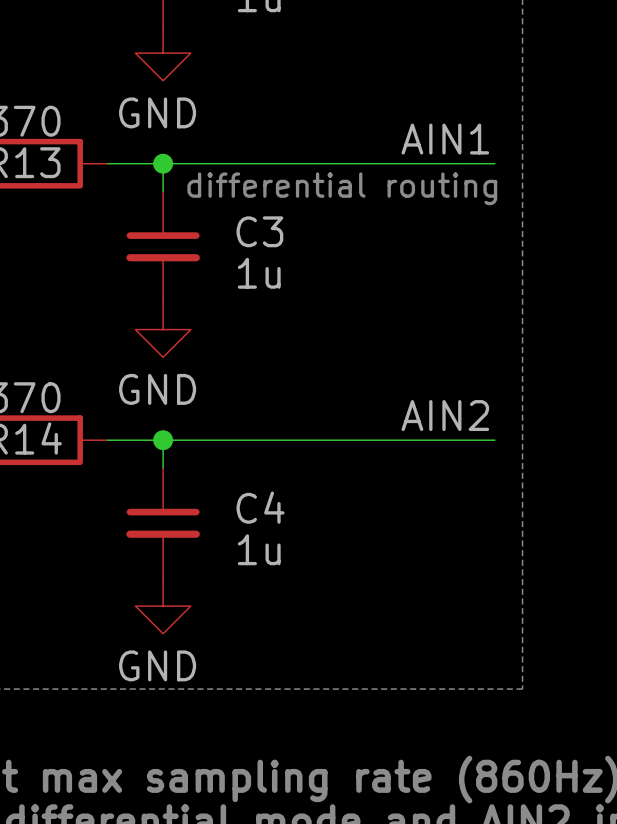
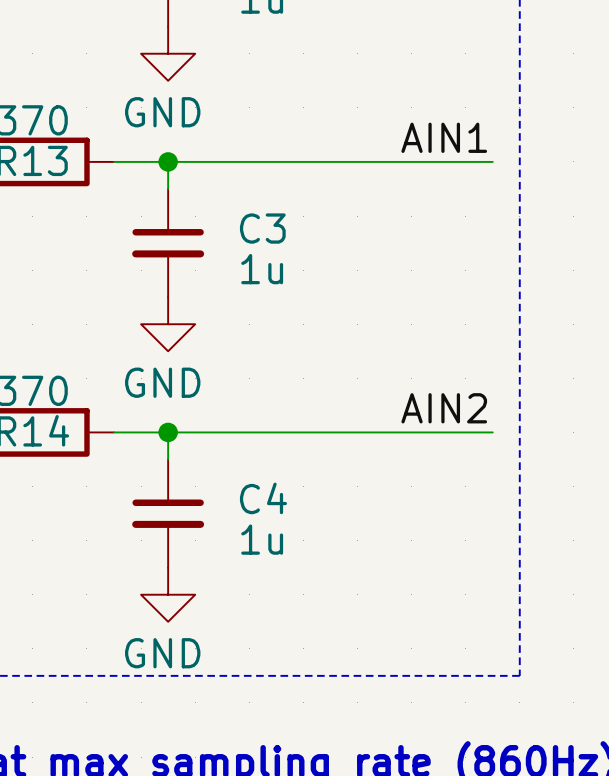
text: differential routing (342, 188) -> none

